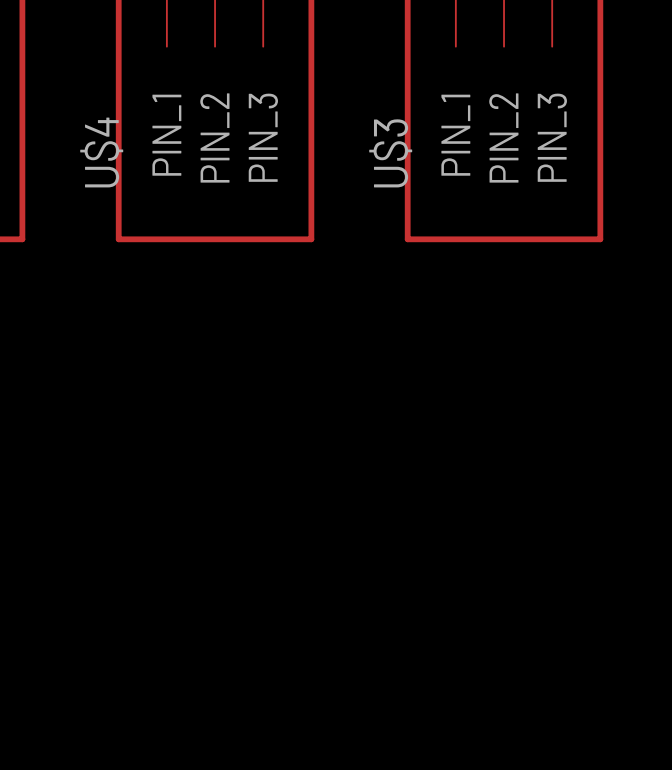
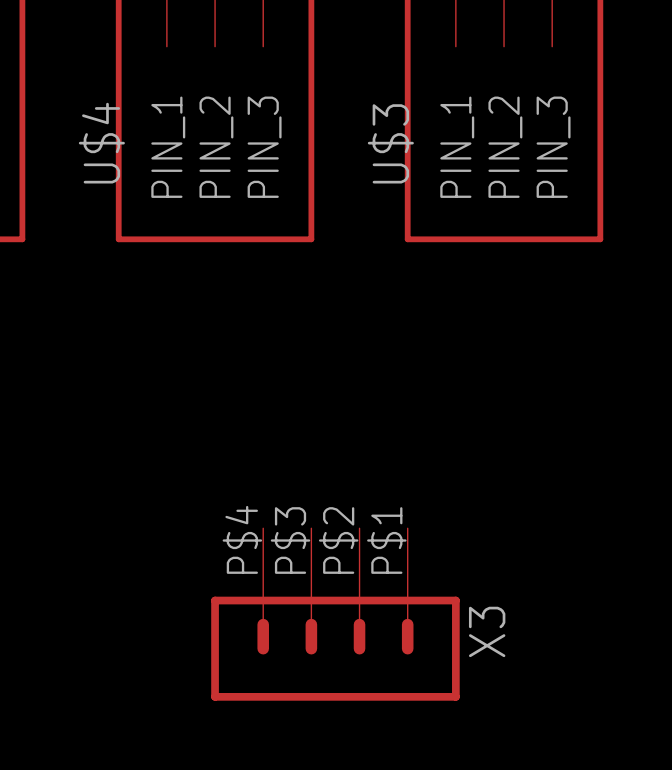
X3: none -> (335, 614)

